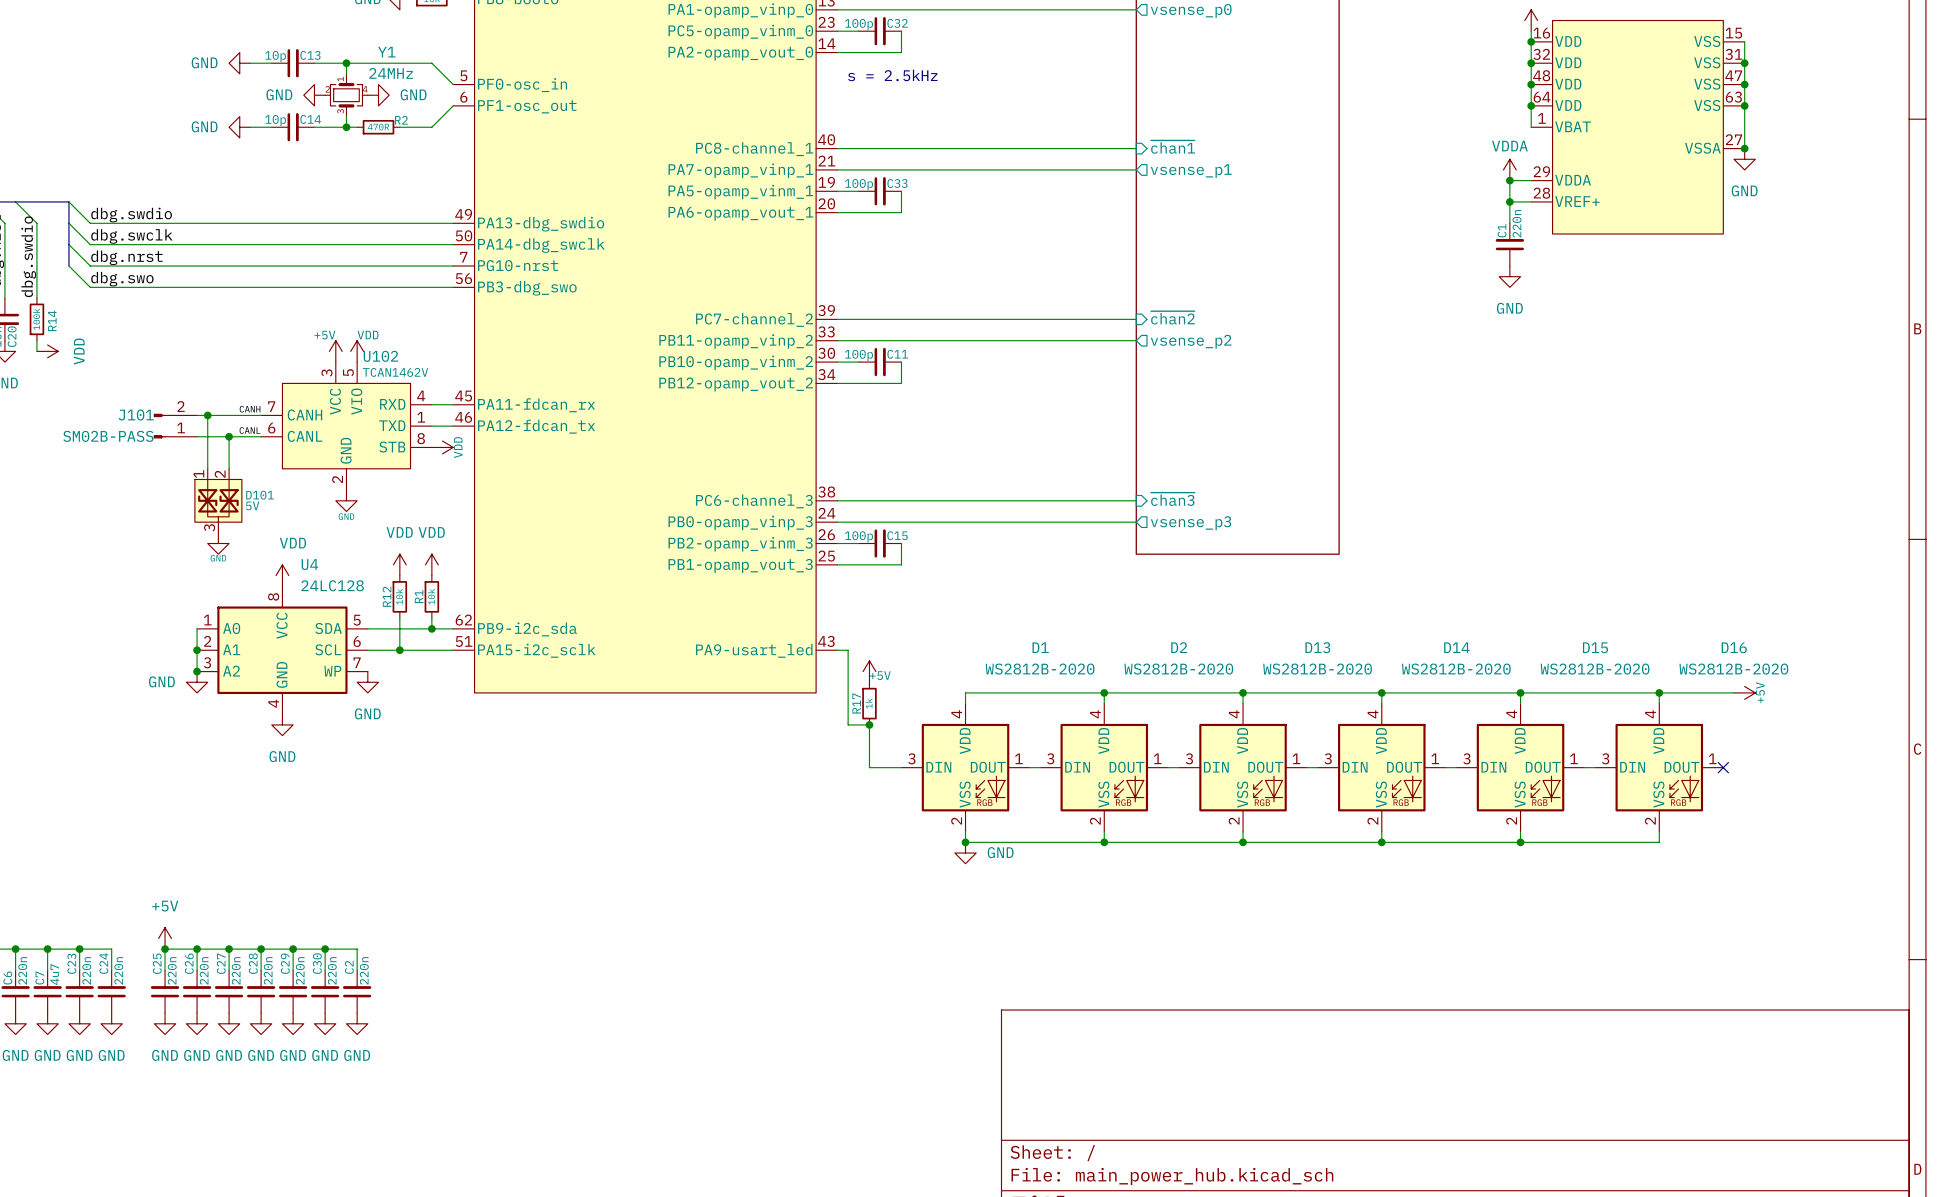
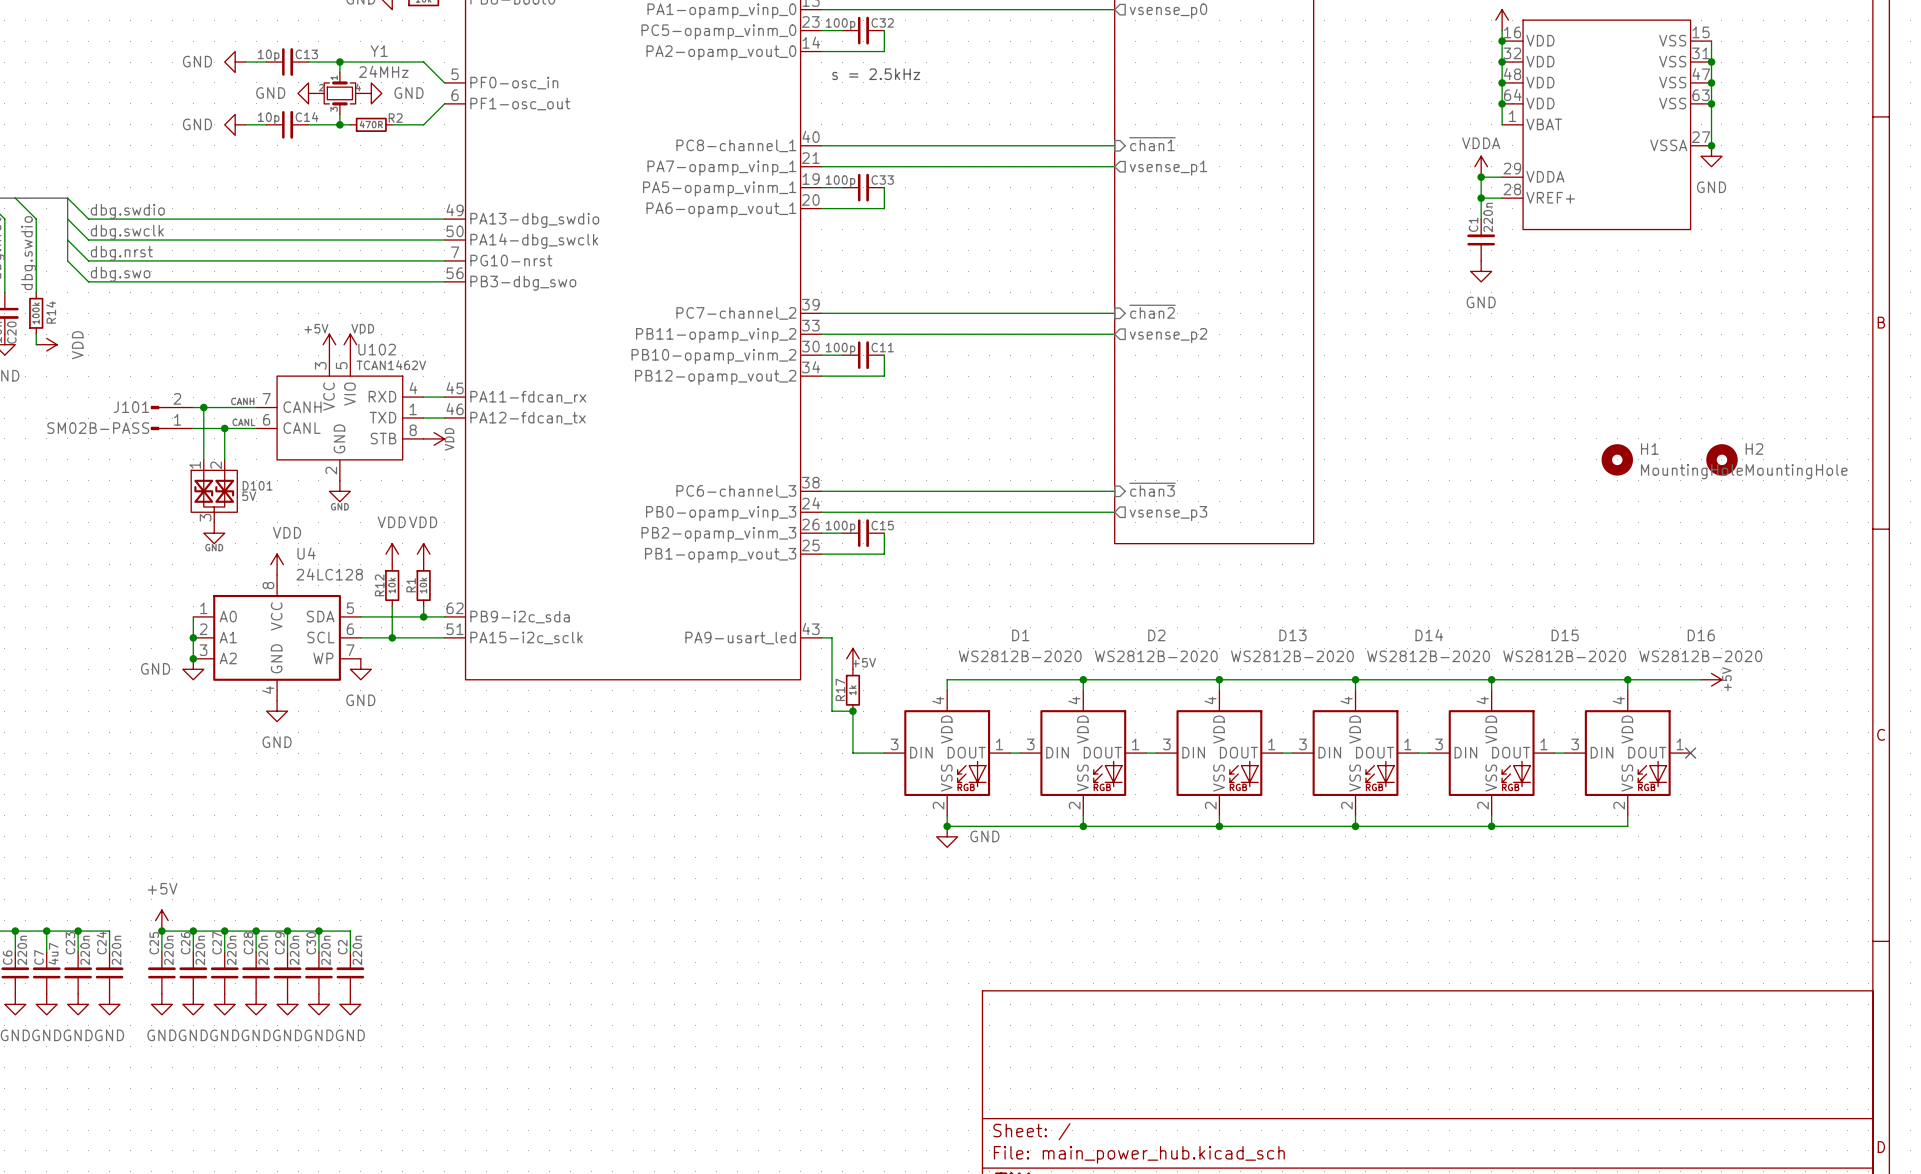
H1: none -> MountingHole (1617, 459)
H2: none -> MountingHole (1721, 459)

